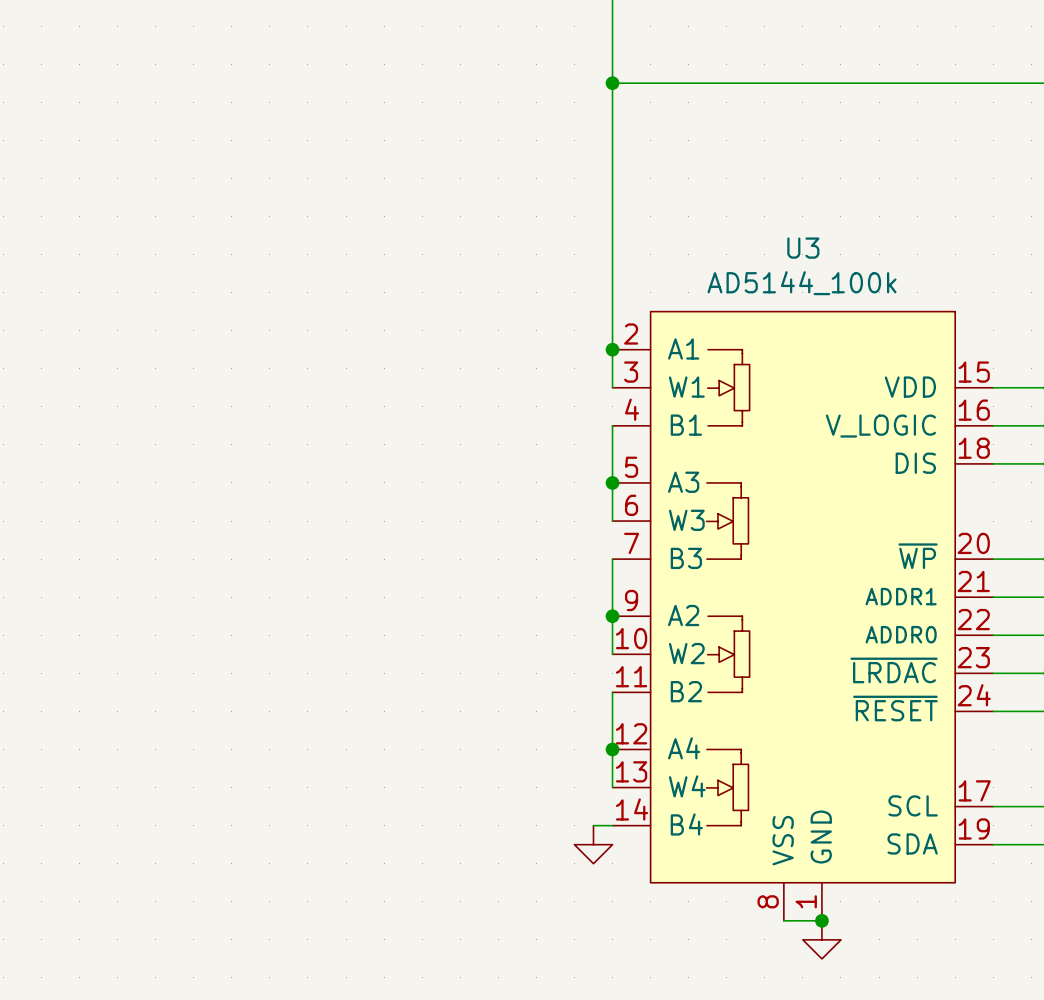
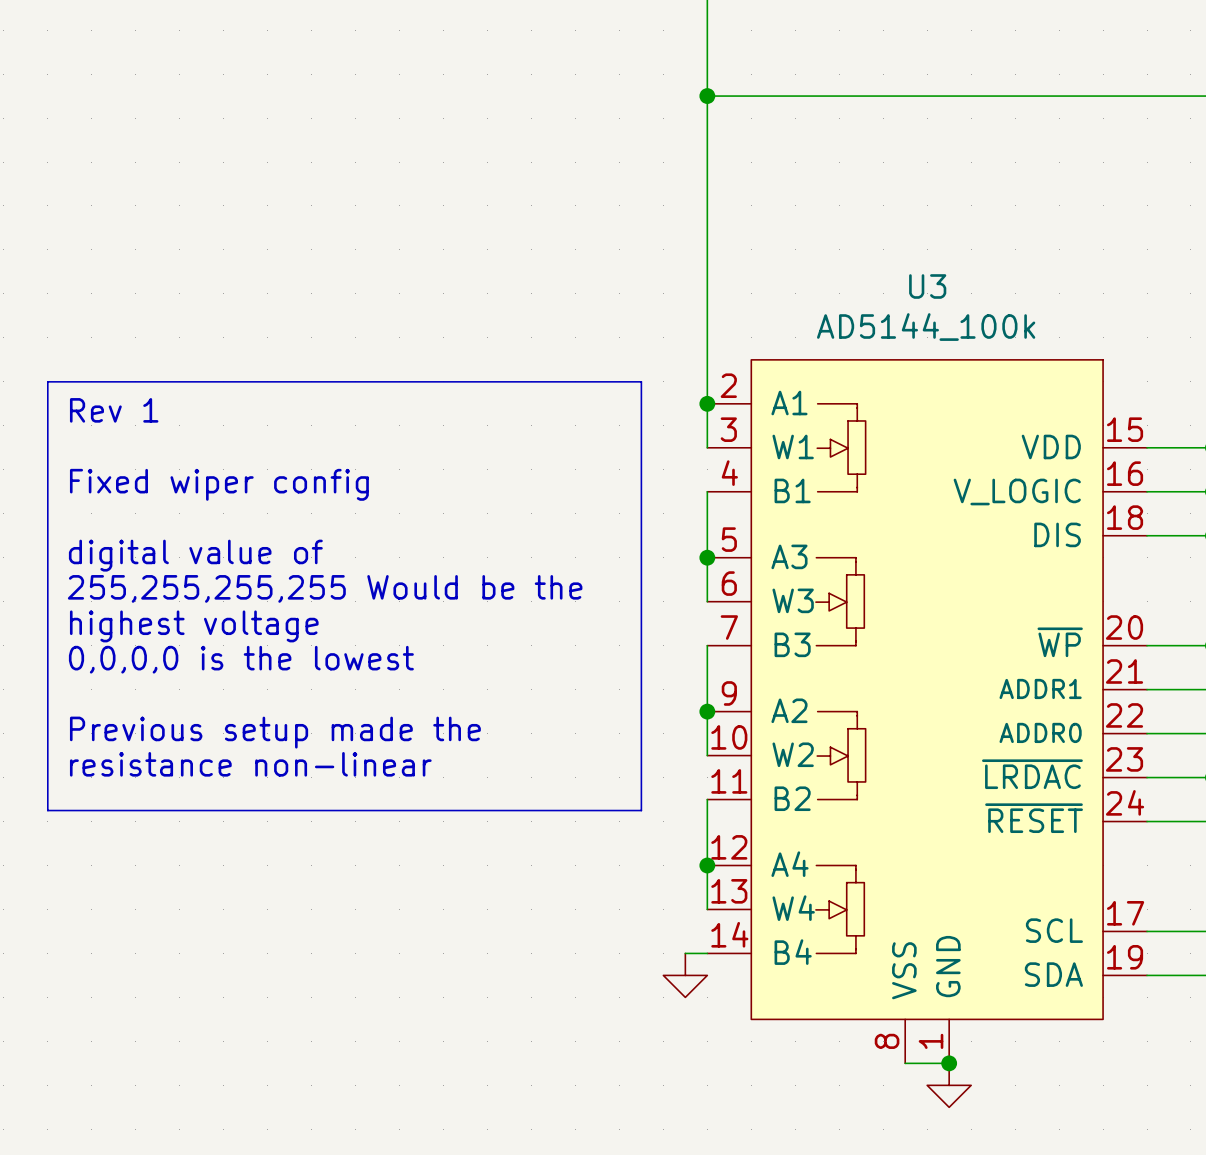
line: none -> (47, 381) (641, 381) (641, 810) (47, 810) (47, 381)
text: none -> Rev 1 (114, 410)
text: none -> Fixed wiper config (219, 484)
text: none -> digital value of (195, 555)
text: none -> 255,255,255,255 Would be the (325, 588)
text: none -> highest voltage (194, 626)
text: none -> 0,0,0,0 is the lowest (241, 659)
text: none -> Previous setup made the (275, 732)
text: none -> resistance non-linear (250, 764)

